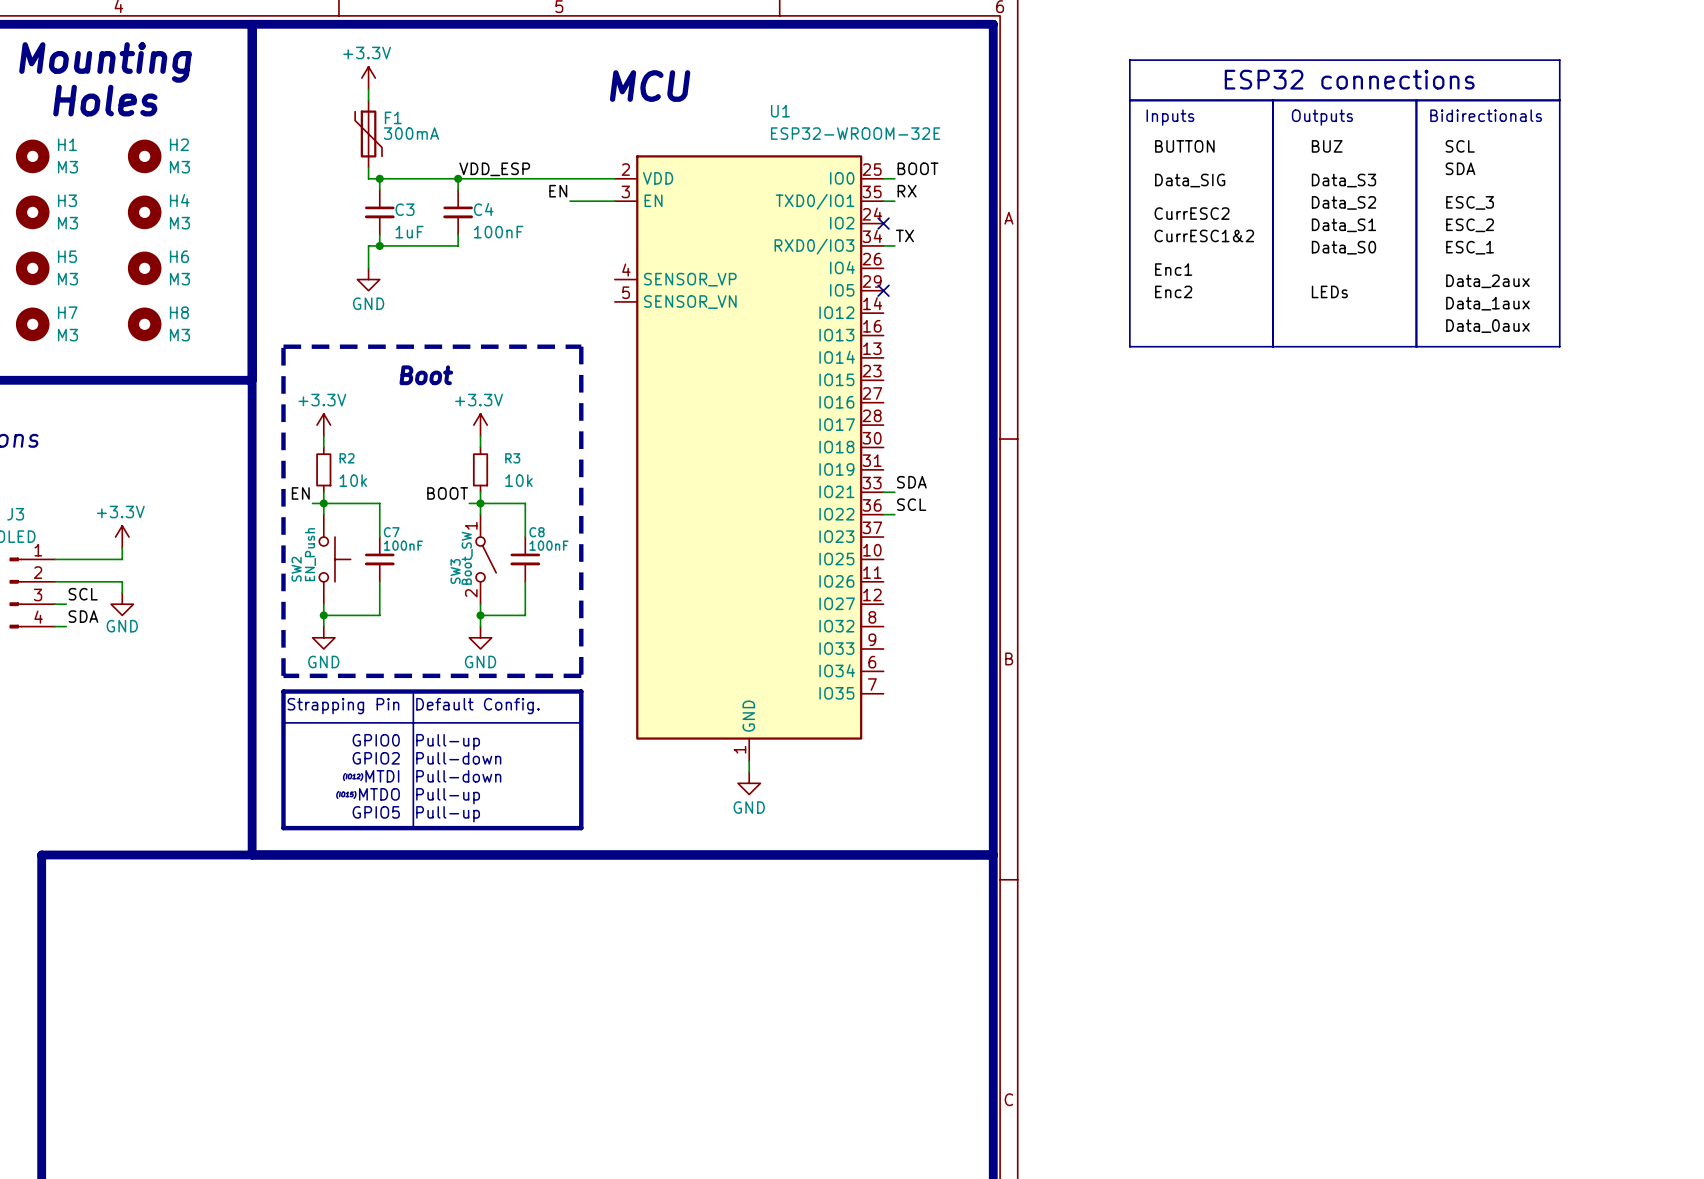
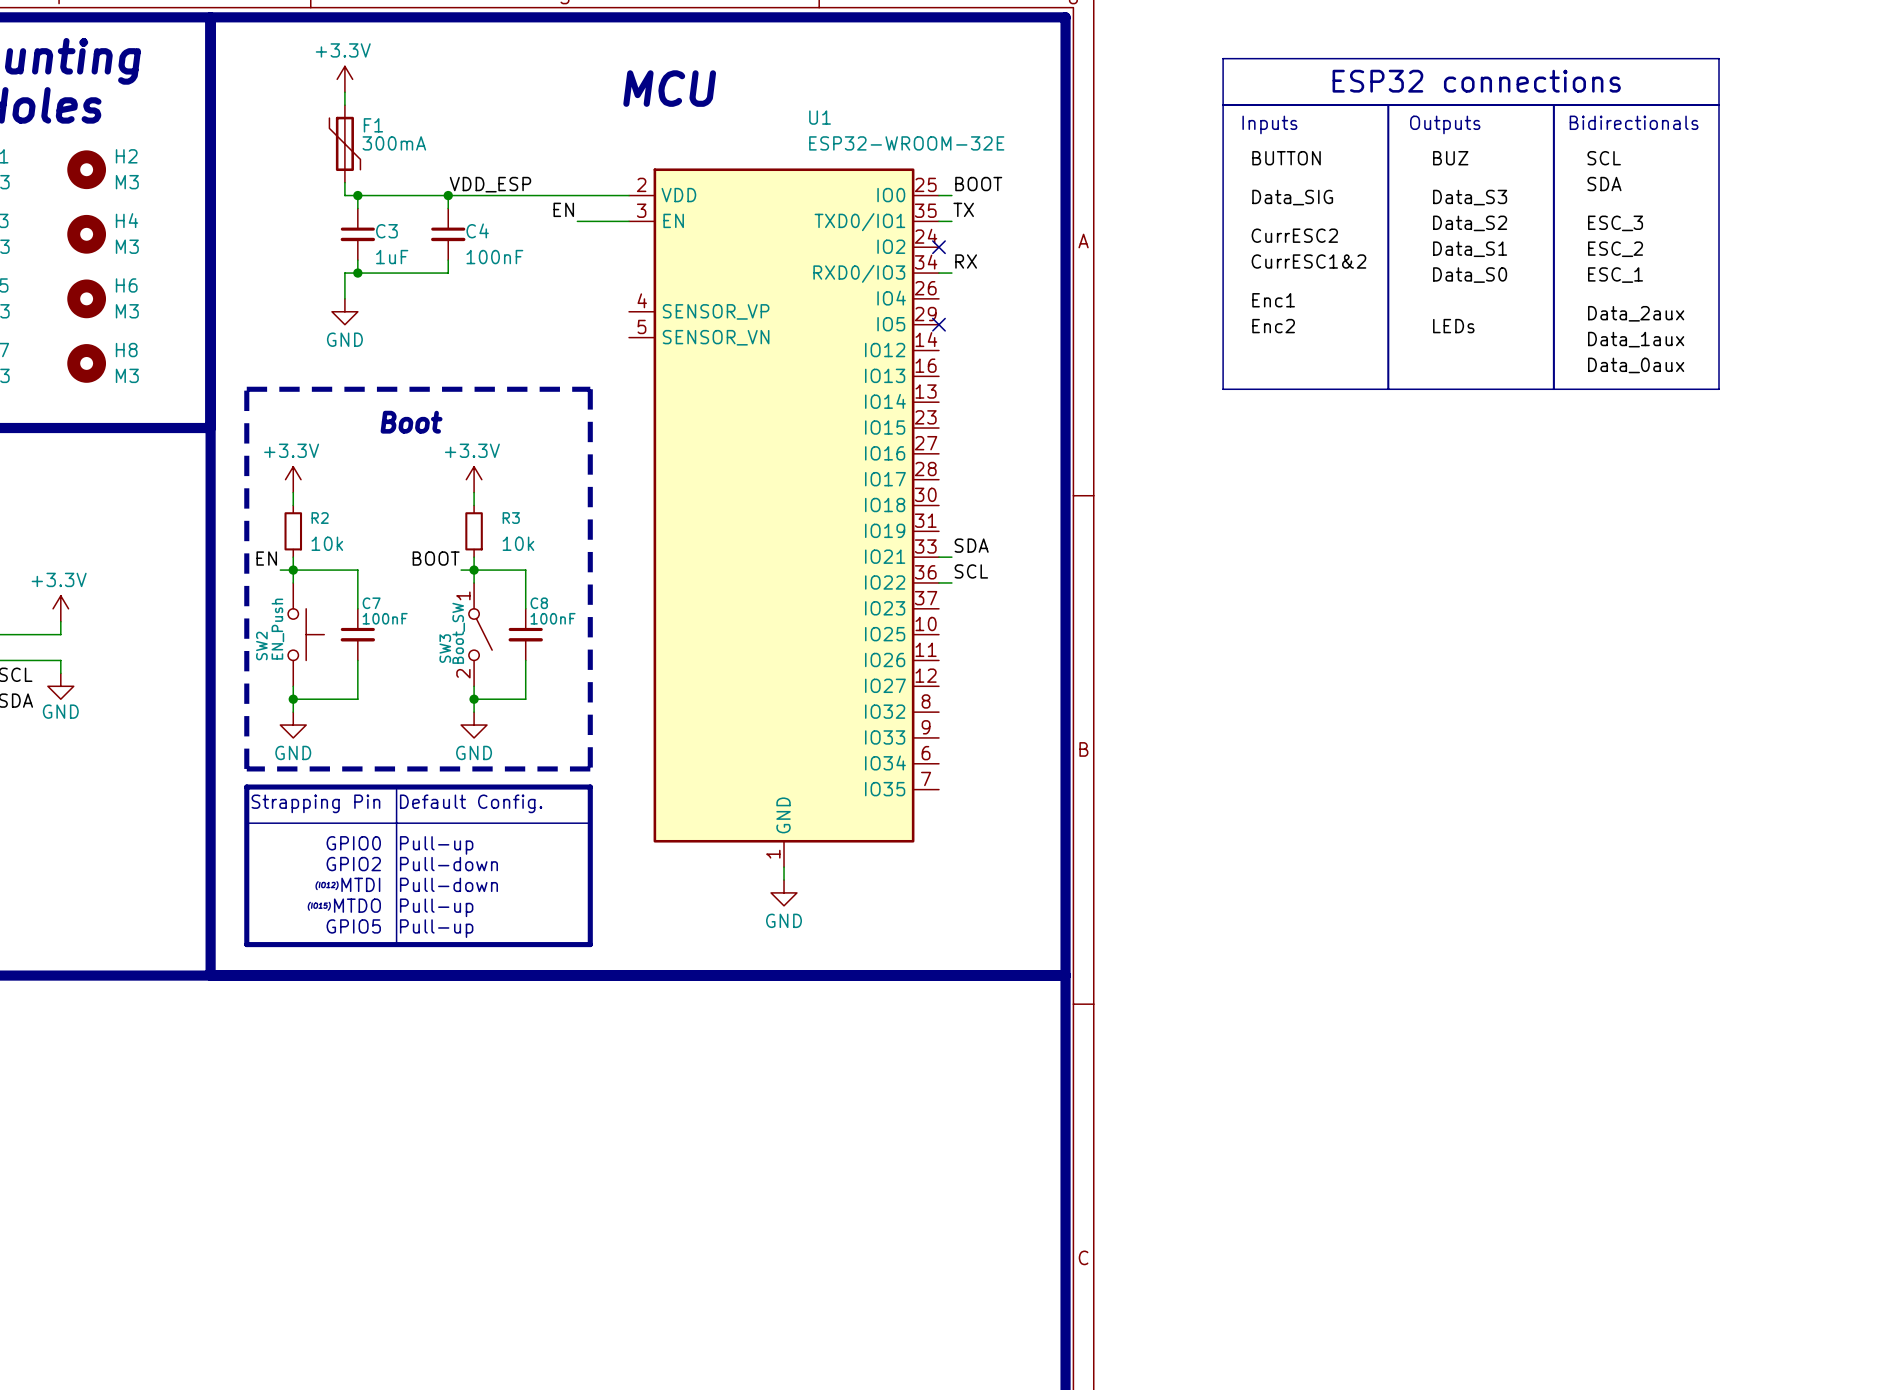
label: RX (907, 191) -> TX (963, 209)
label: TX (904, 235) -> RX (966, 261)

